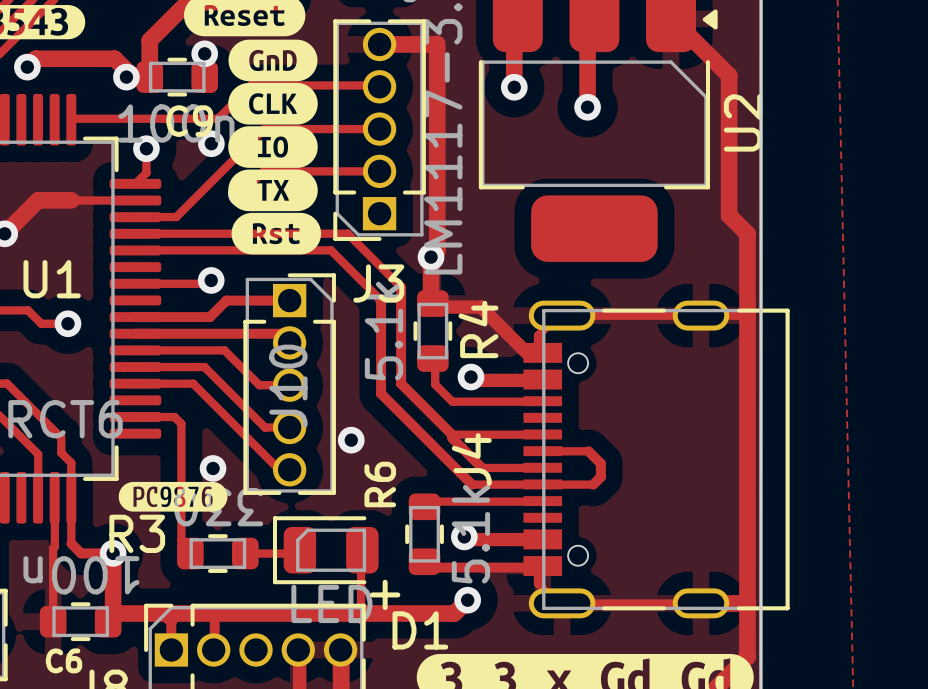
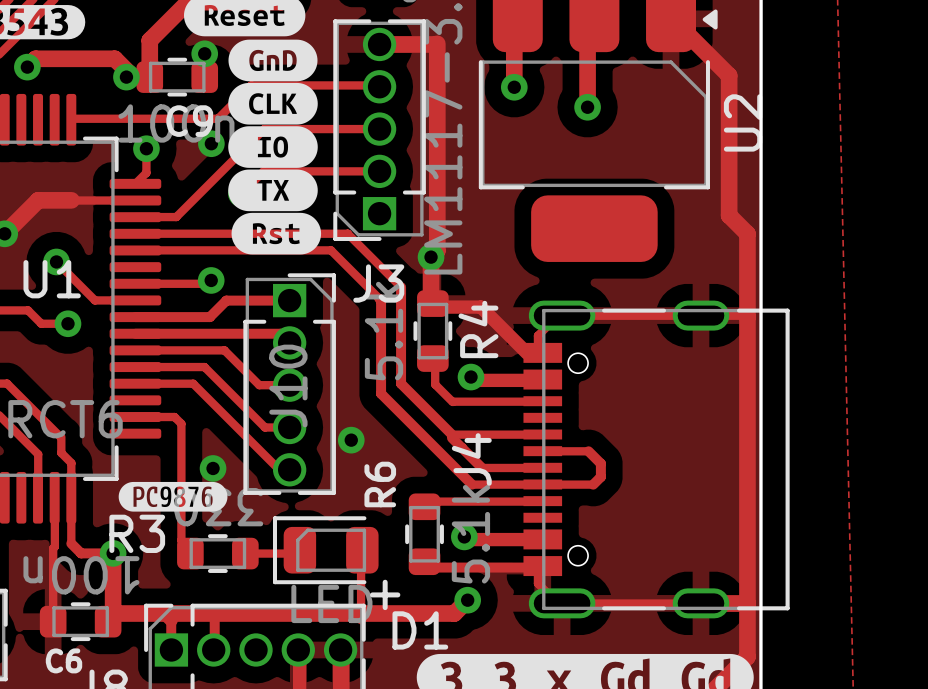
track: none -> (56, 261) (94, 300) (135, 300)
via: none -> (56, 261)

